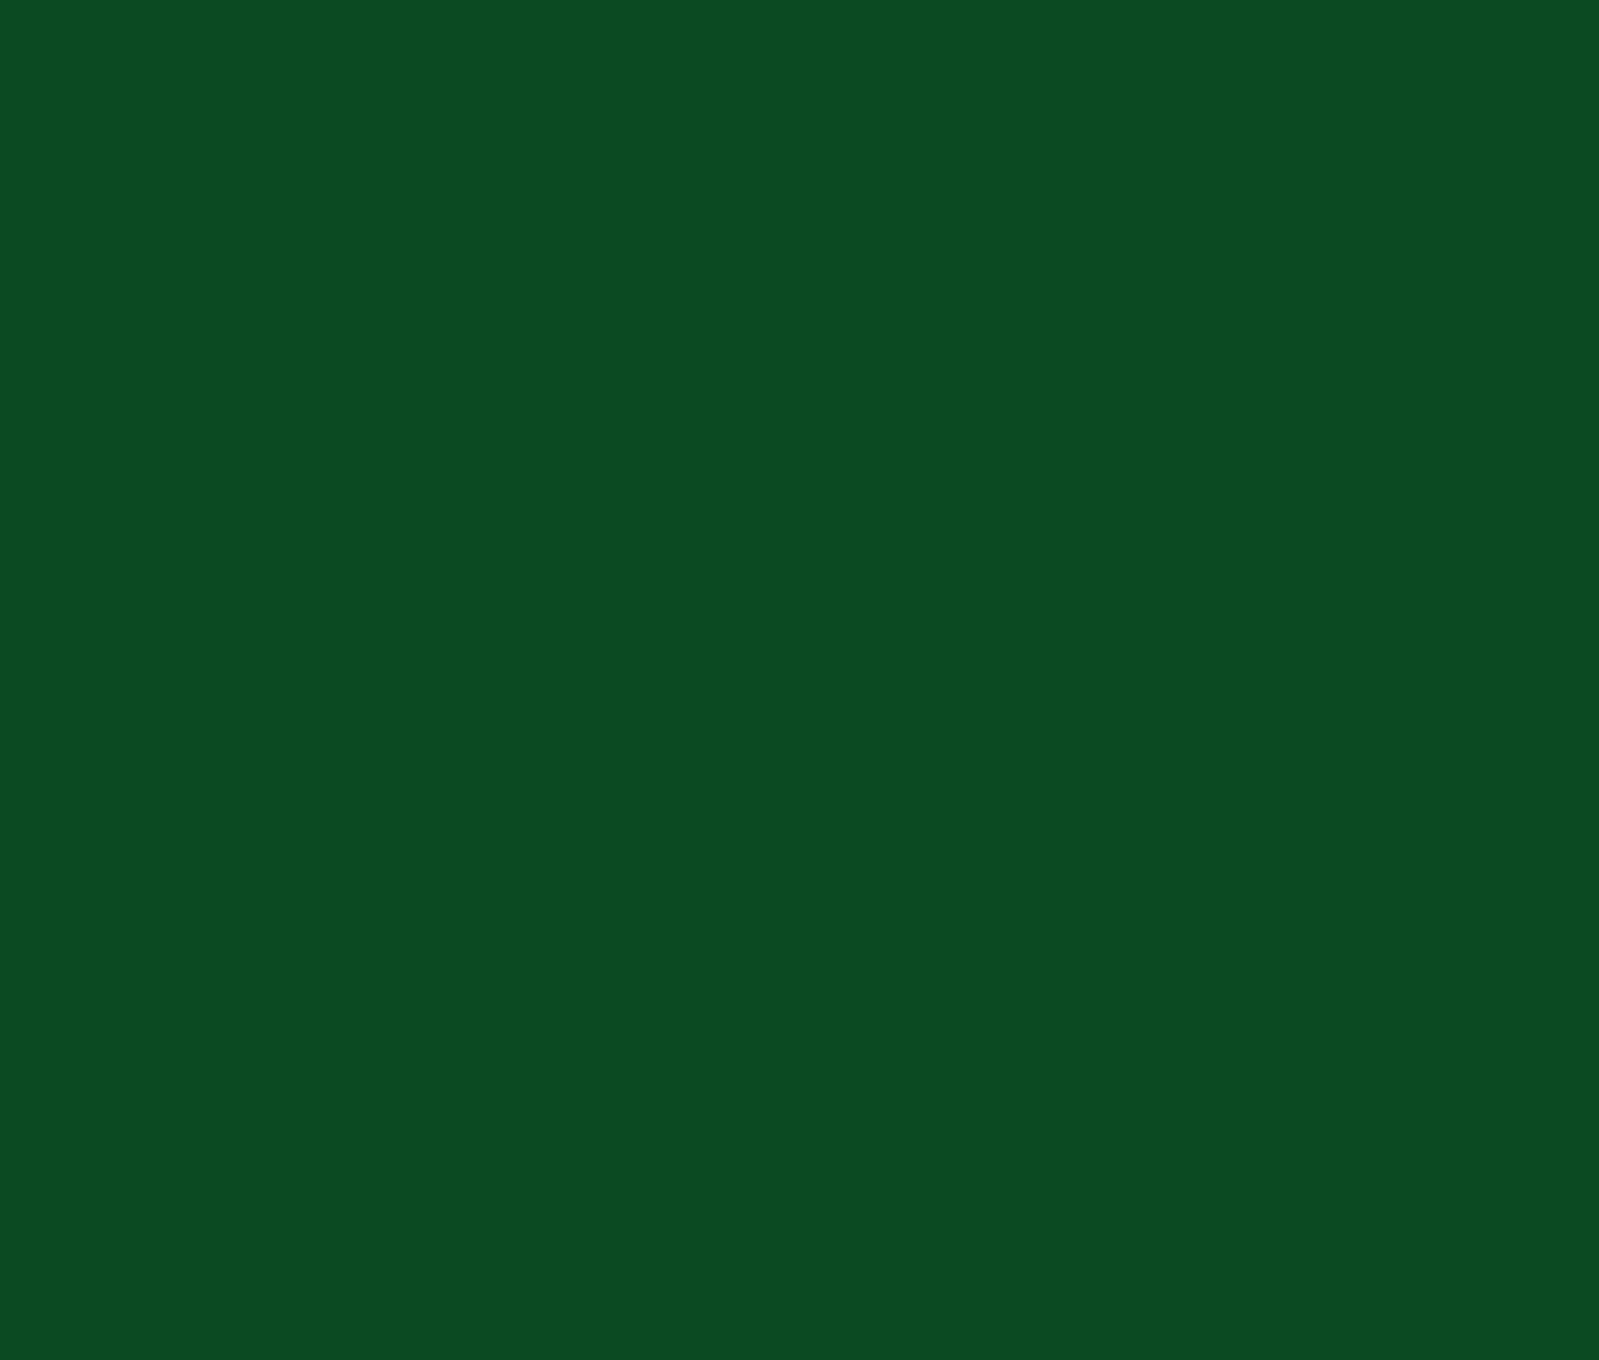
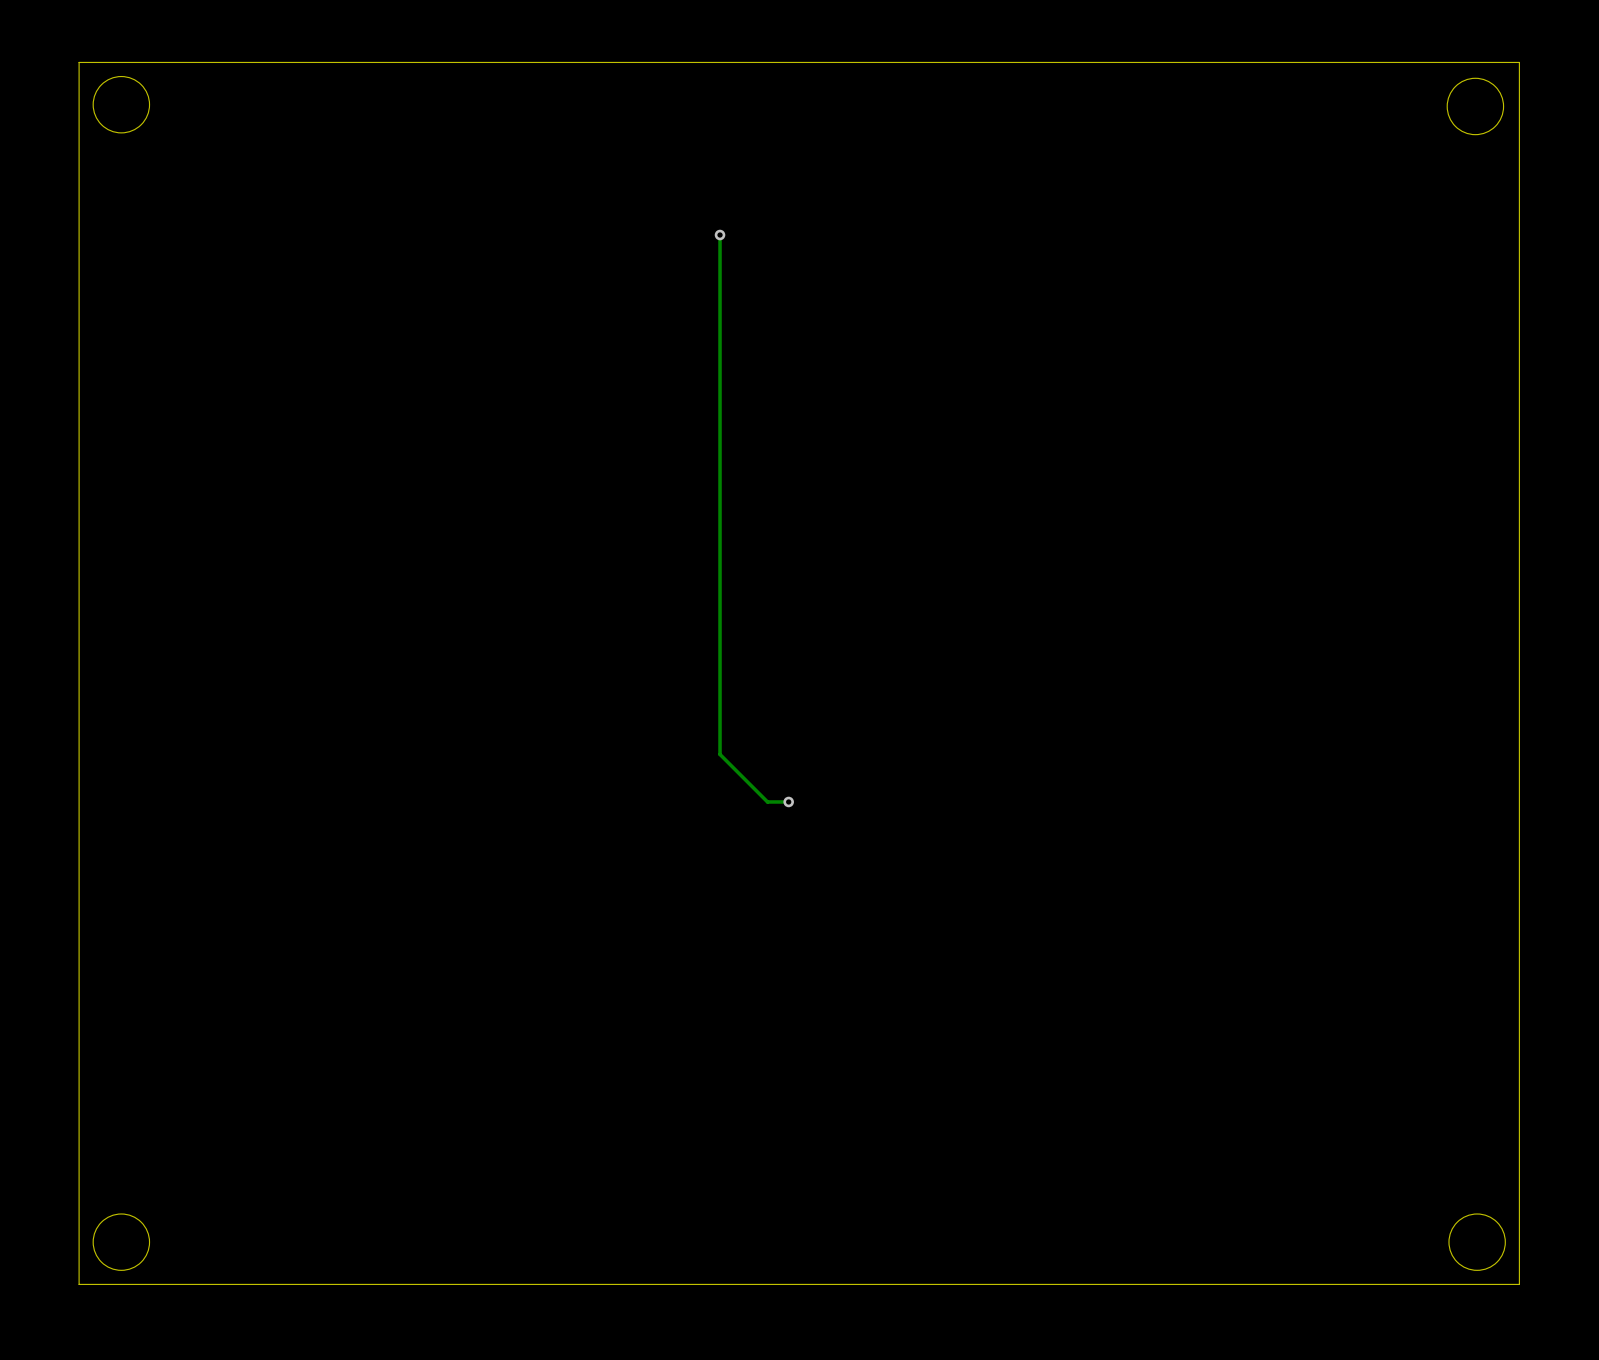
board edge: none -> (1519, 62) (79, 62) (79, 1284) (1519, 1284) (1519, 62)
round board edge: none -> [92, 76, 150, 134]
round board edge: none -> [1446, 77, 1505, 136]
track: none -> (720, 235) (720, 754) (767, 801) (788, 801)
via: none -> (720, 235)
via: none -> (788, 801)
round board edge: none -> [92, 1213, 150, 1271]
round board edge: none -> [1448, 1213, 1506, 1271]

